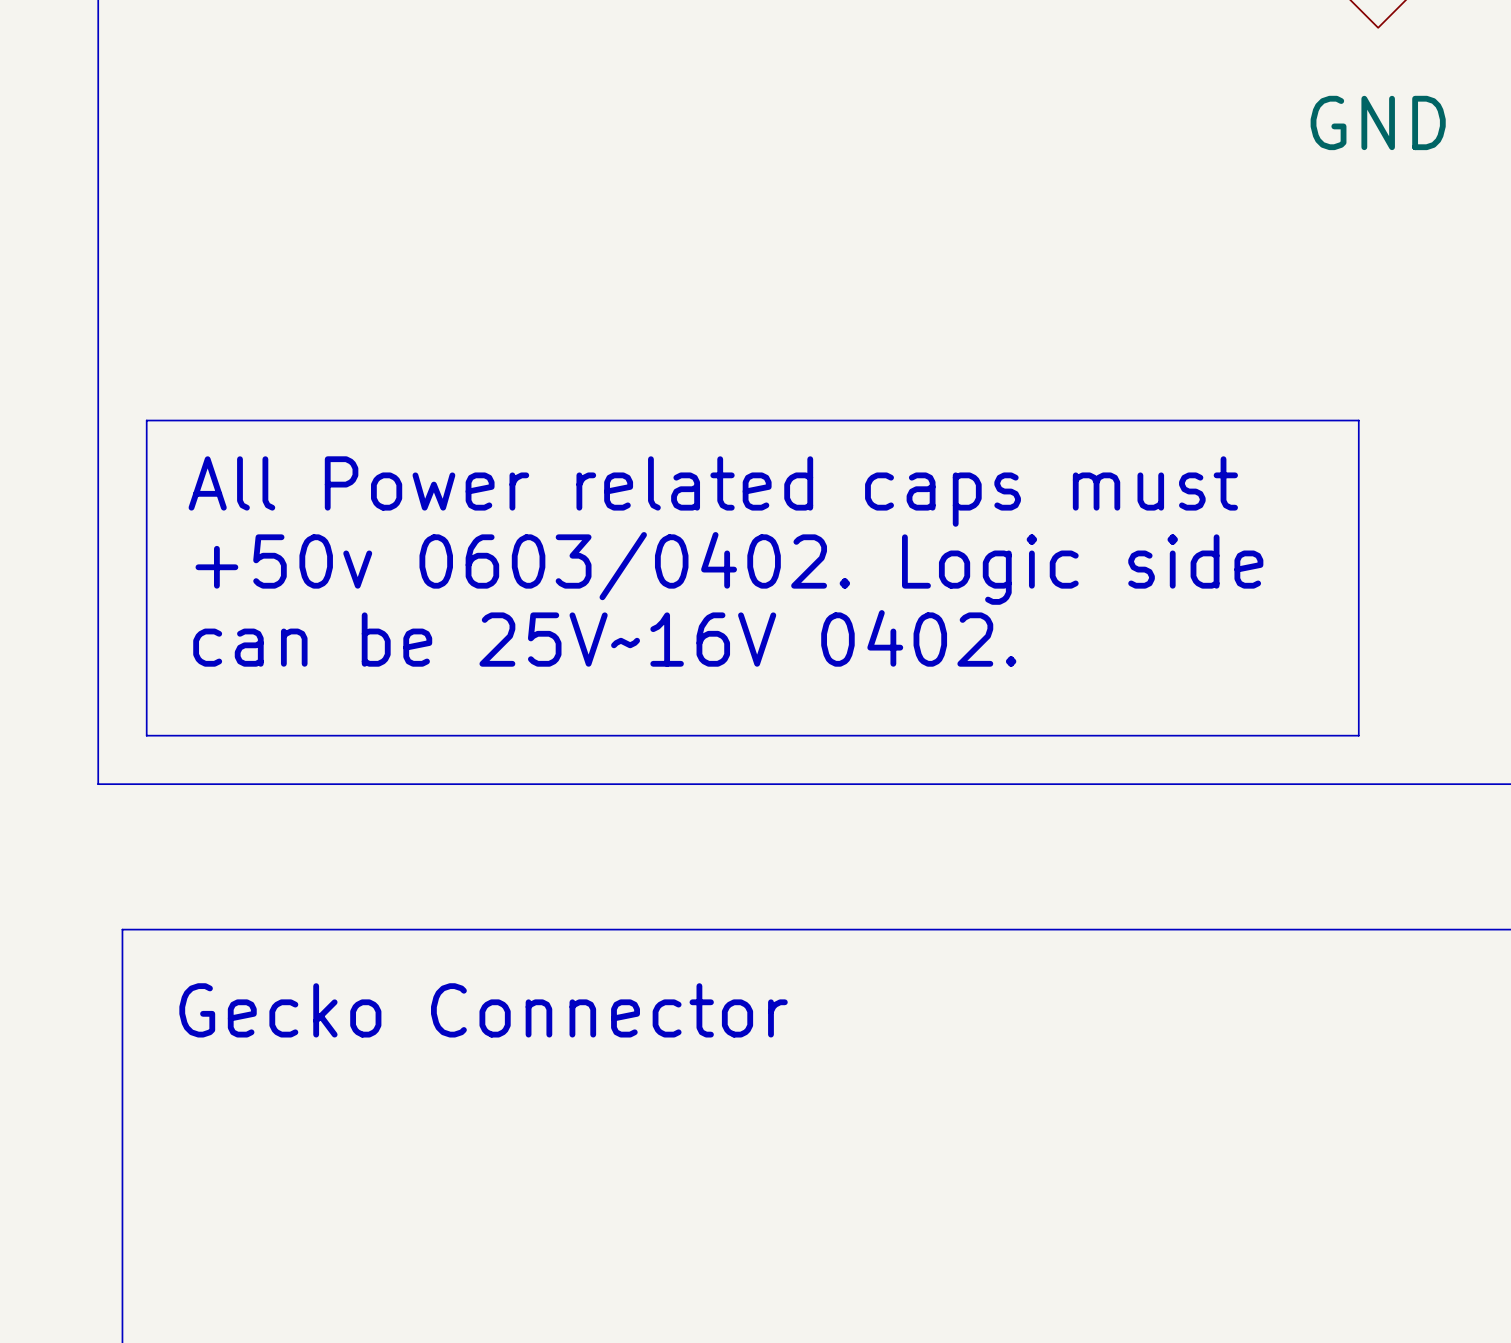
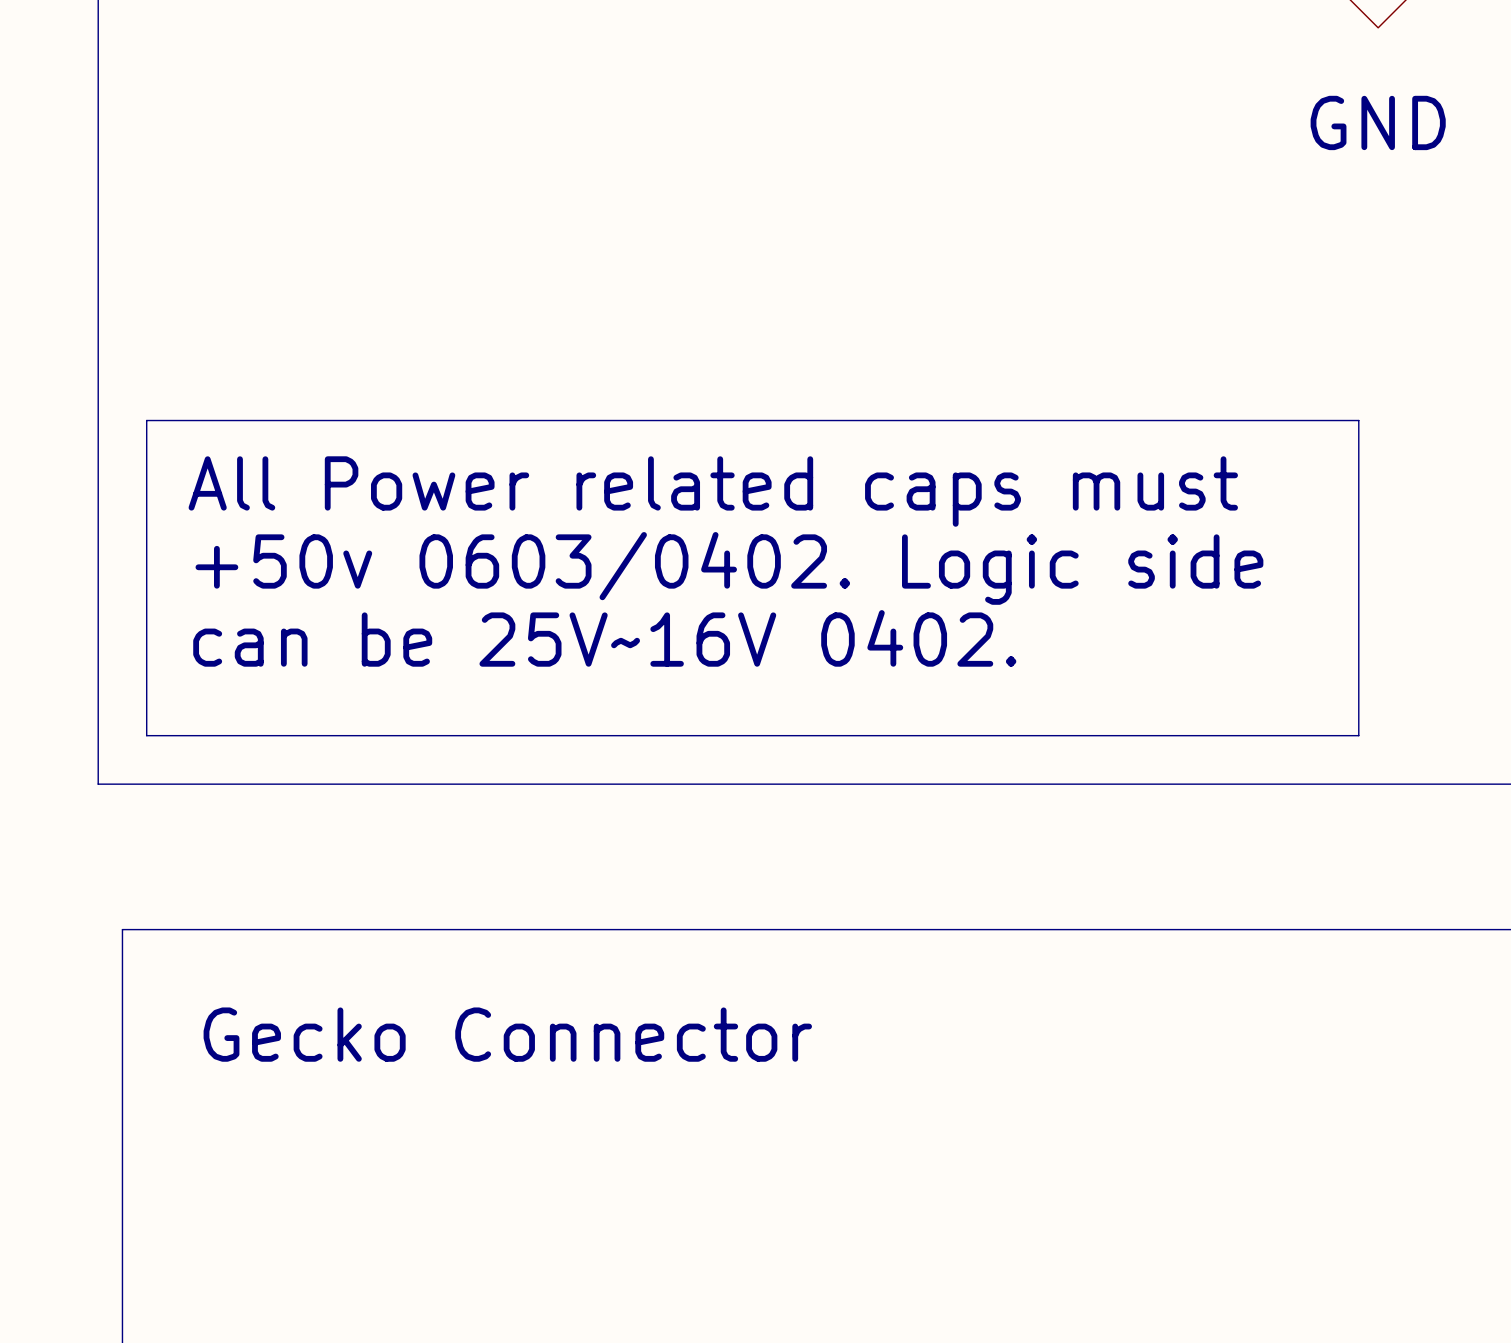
text position: Gecko Connector (483, 1010) -> Gecko Connector (507, 1034)

